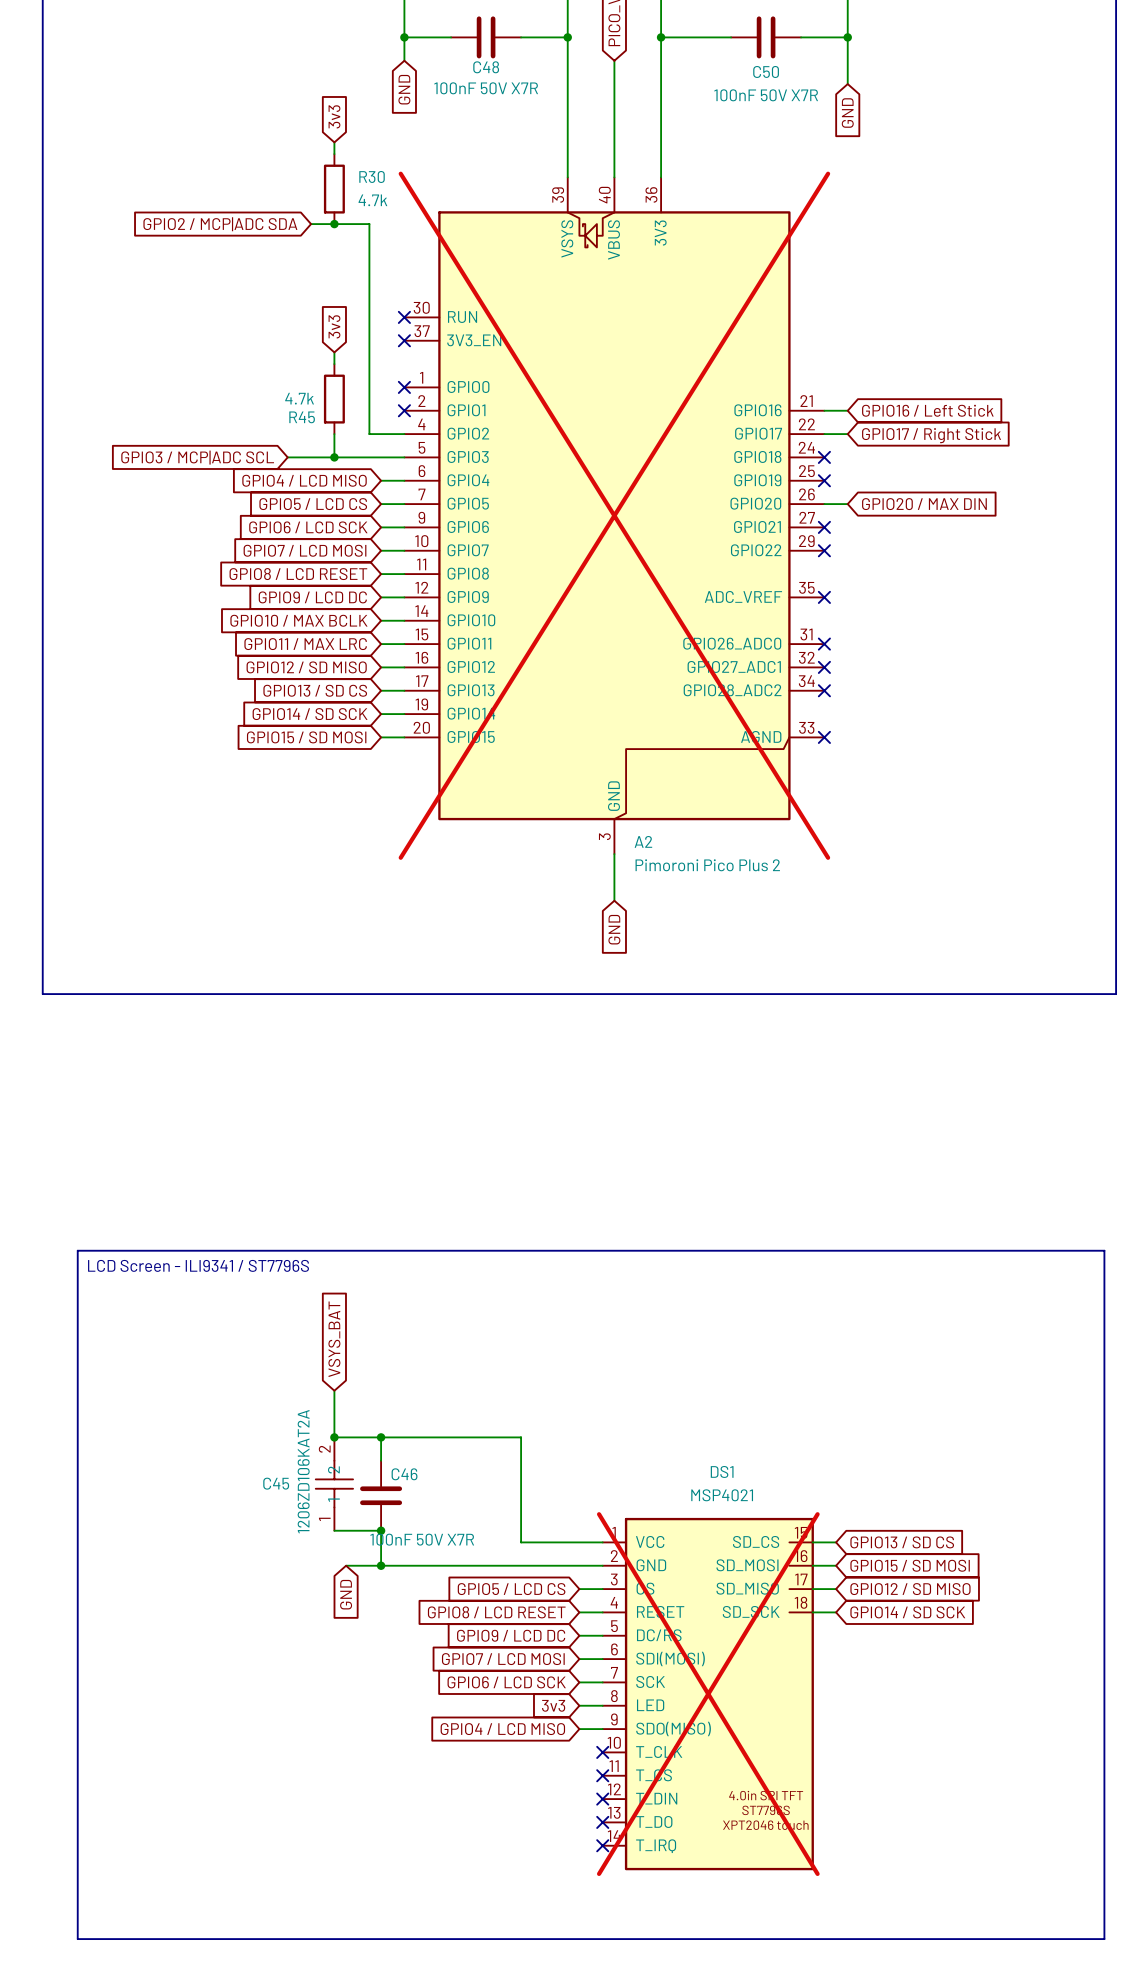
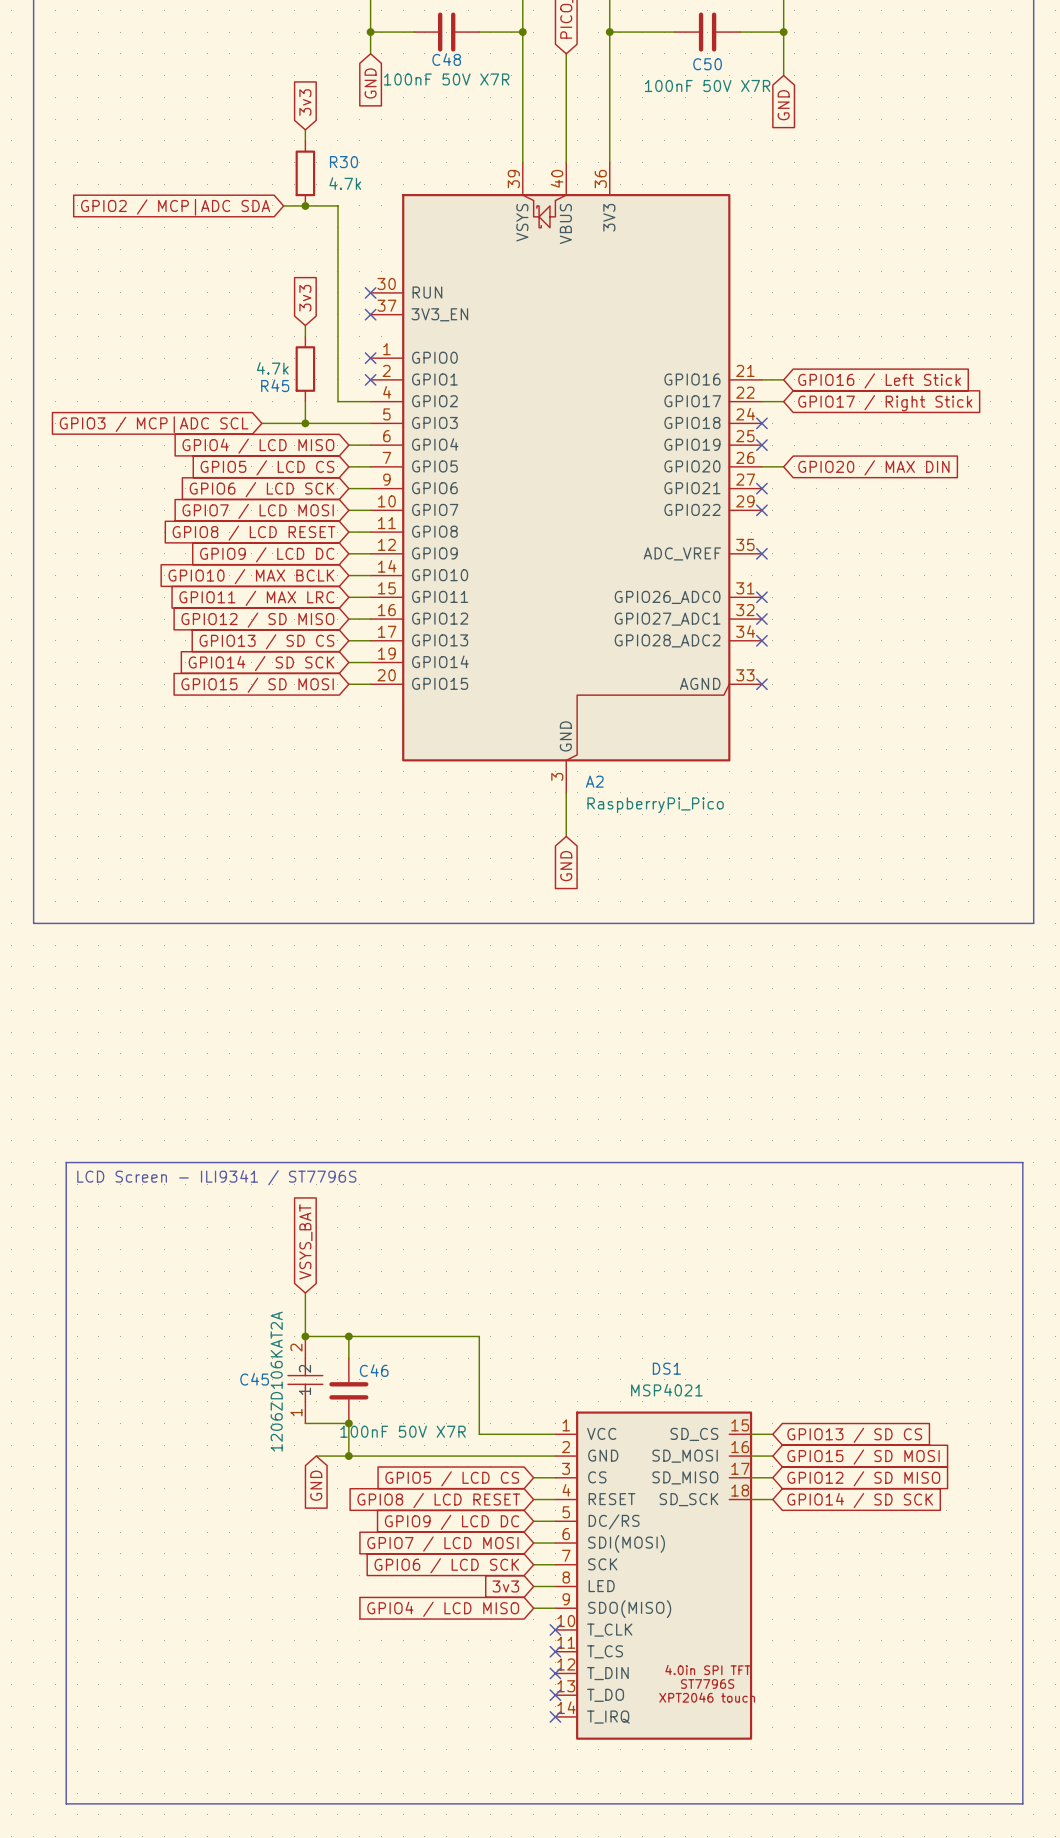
A2 do-not-place cross: (614, 515) -> none
A2 value: Pimoroni Pico Plus 2 (707, 865) -> RaspberryPi_Pico (655, 805)
DS1 do-not-place cross: (708, 1694) -> none

